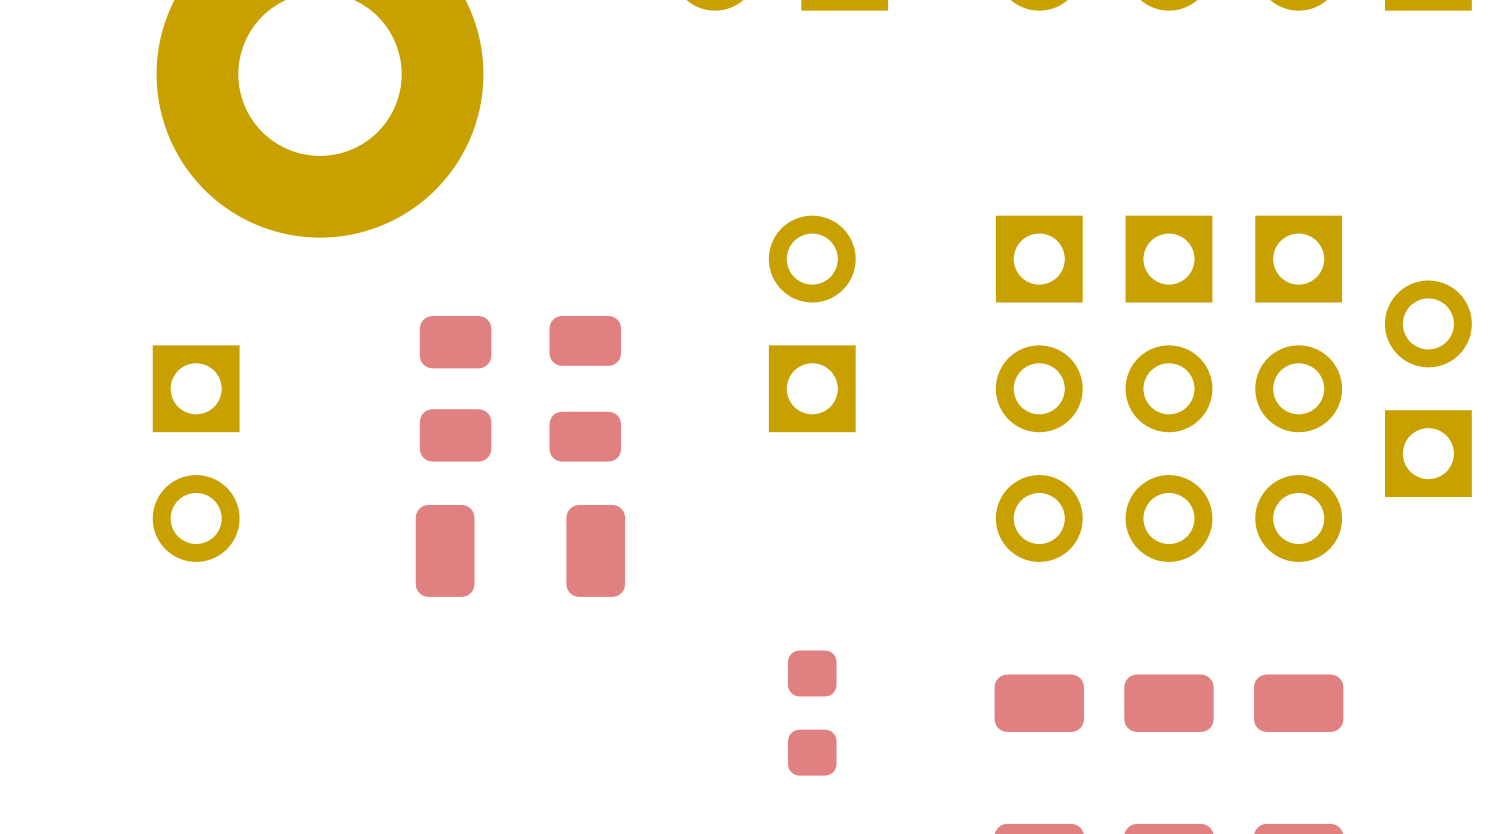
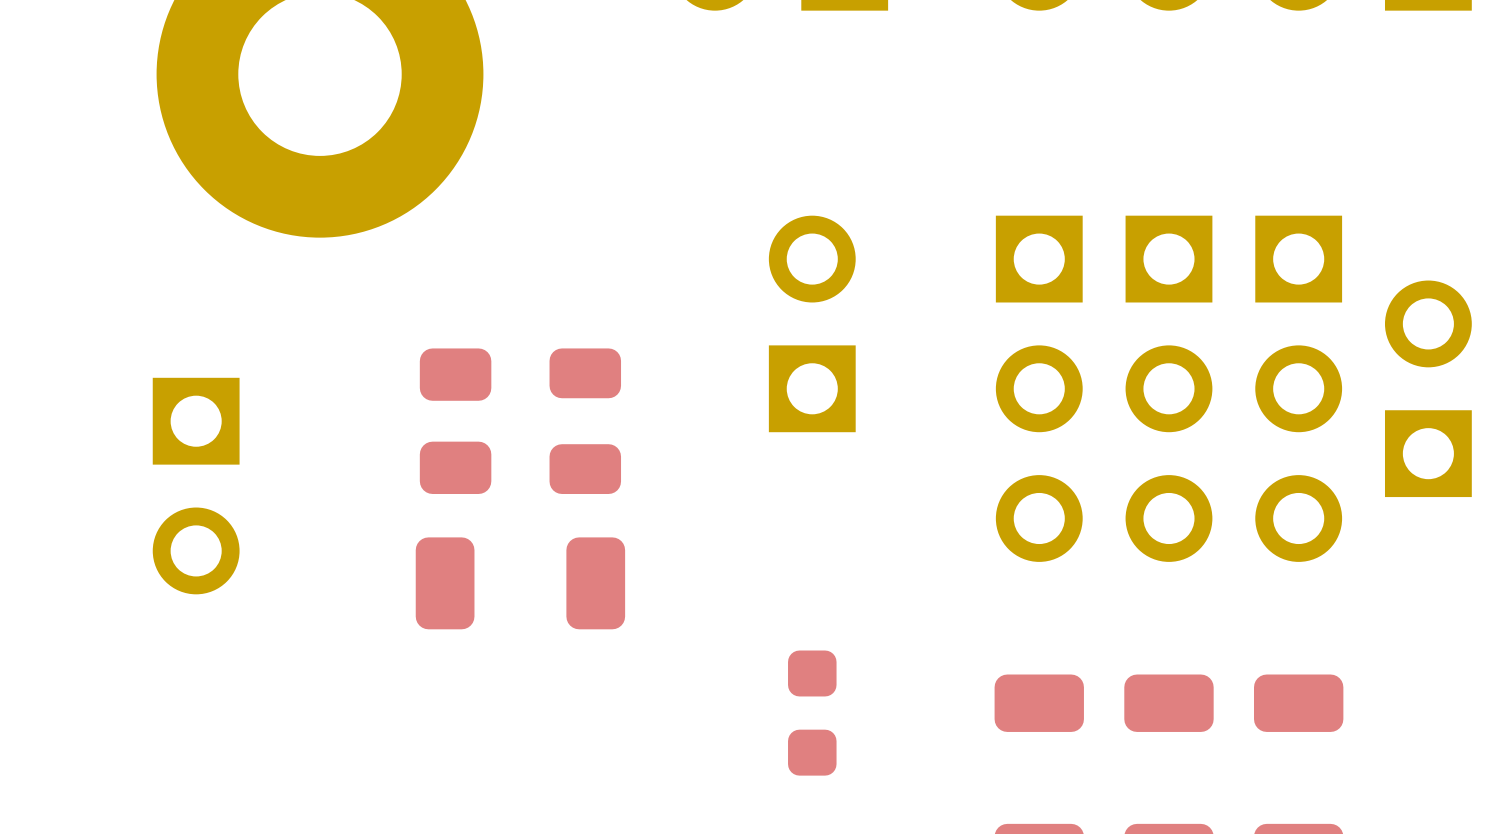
part position: (455, 388) -> (455, 421)
part position: (585, 388) -> (585, 421)
part position: (196, 453) -> (196, 486)
part position: (520, 550) -> (520, 583)

